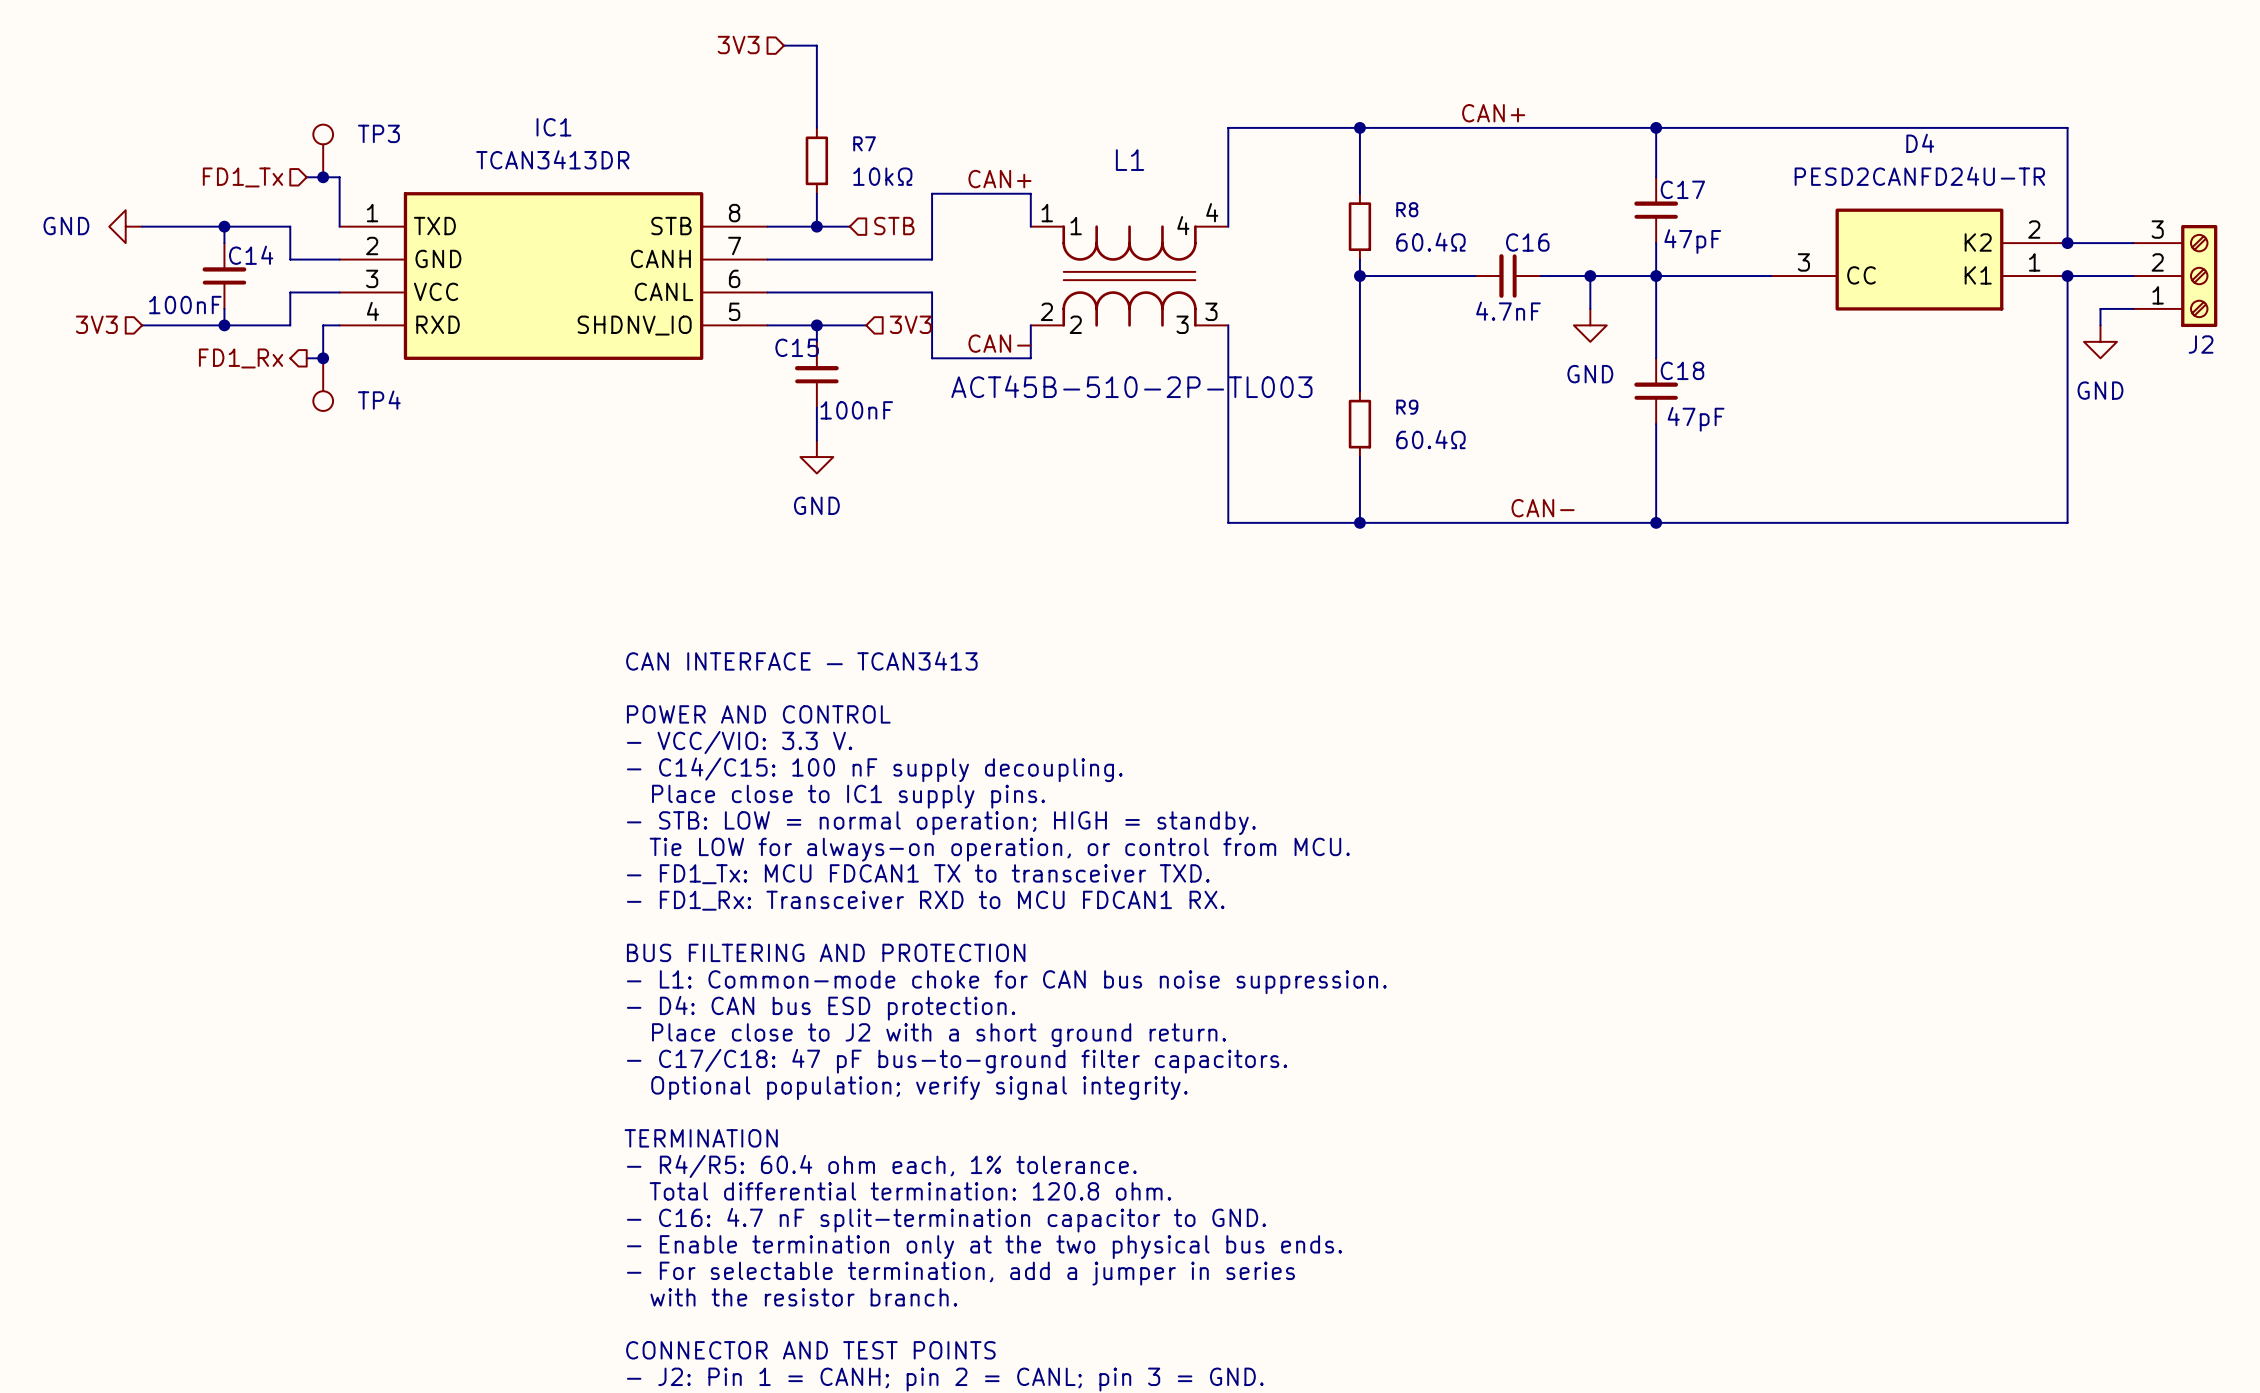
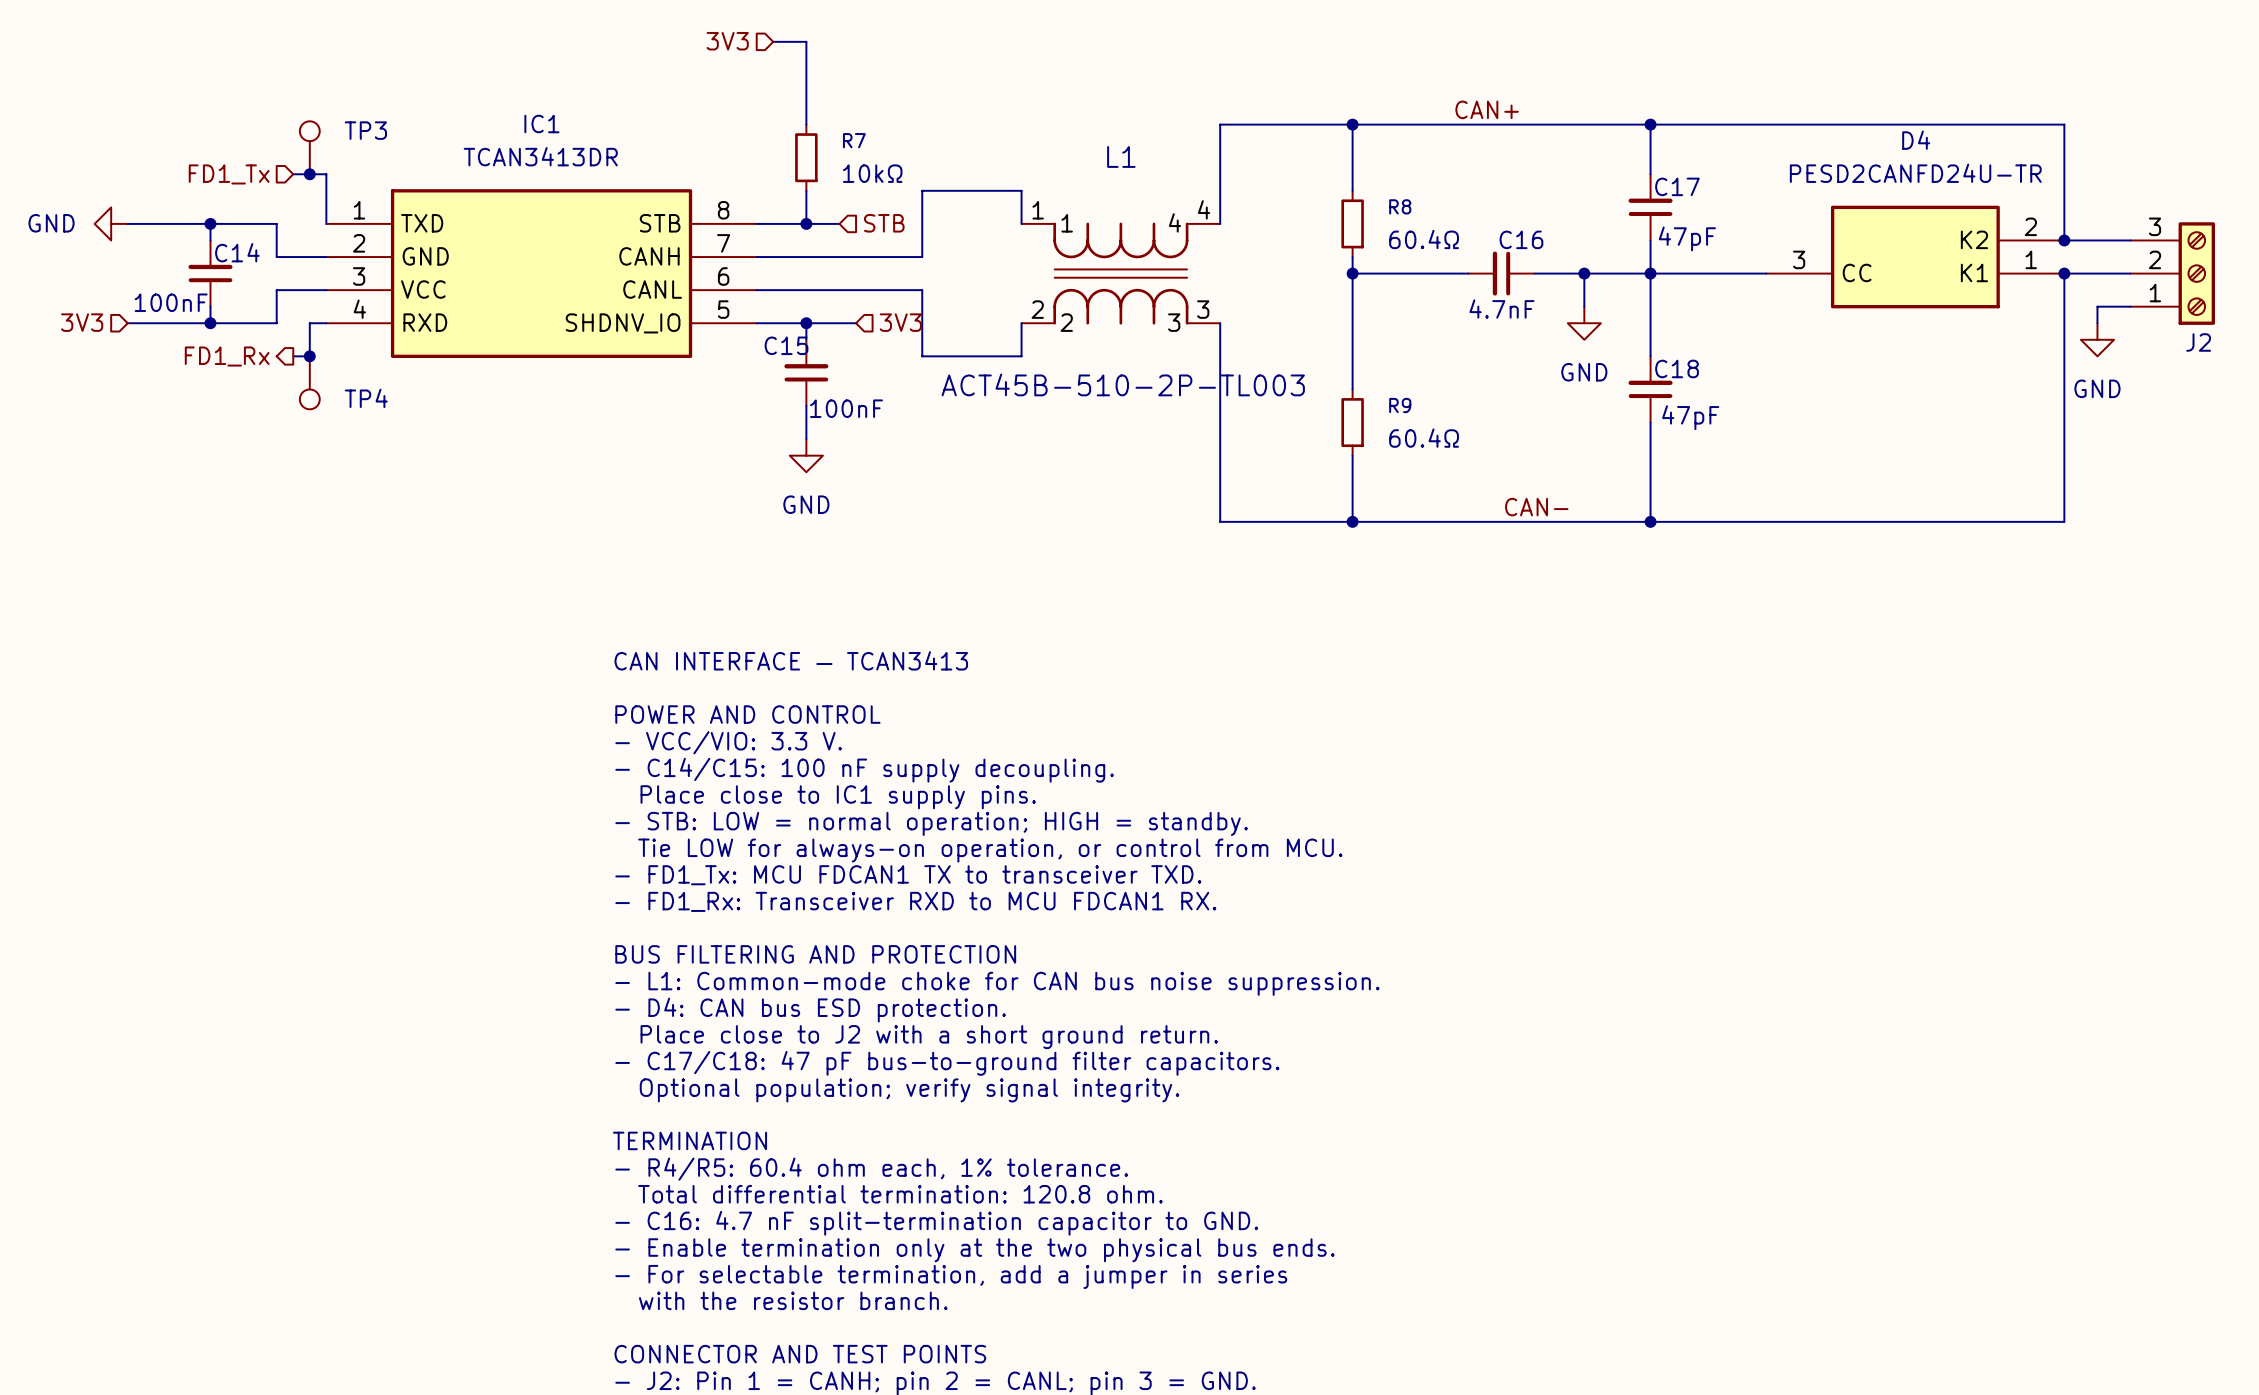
label: CAN+ (999, 179) -> none
label: CAN- (999, 343) -> none

